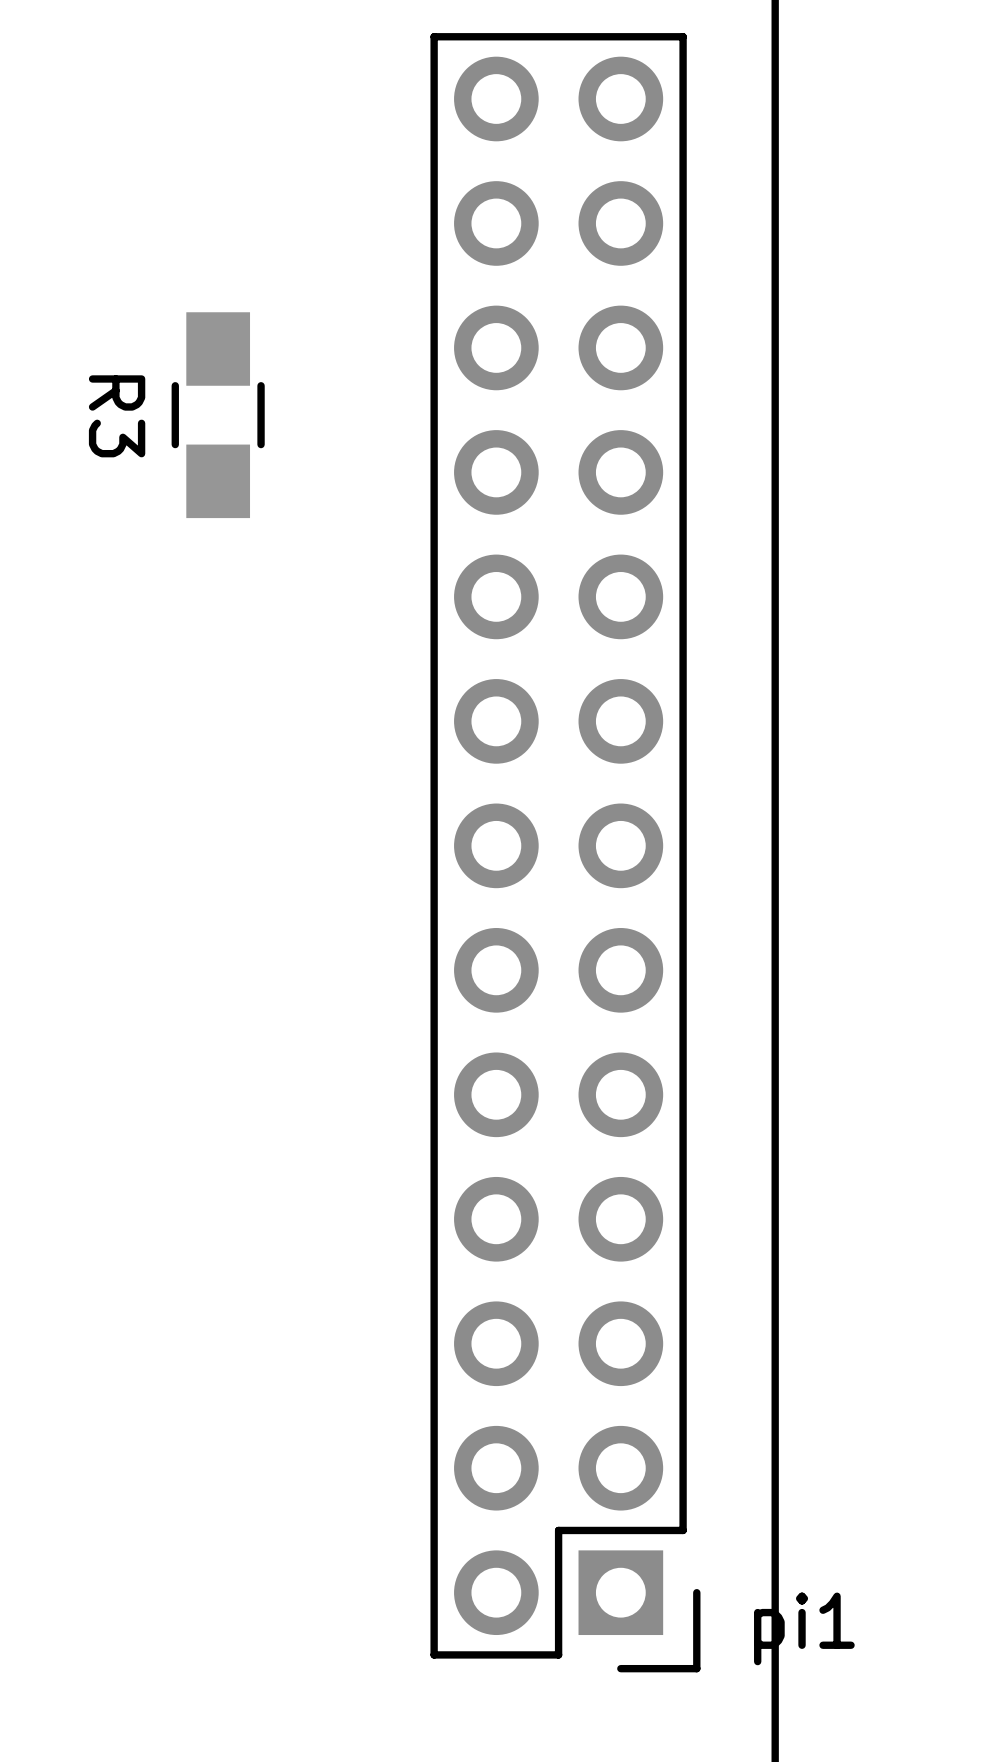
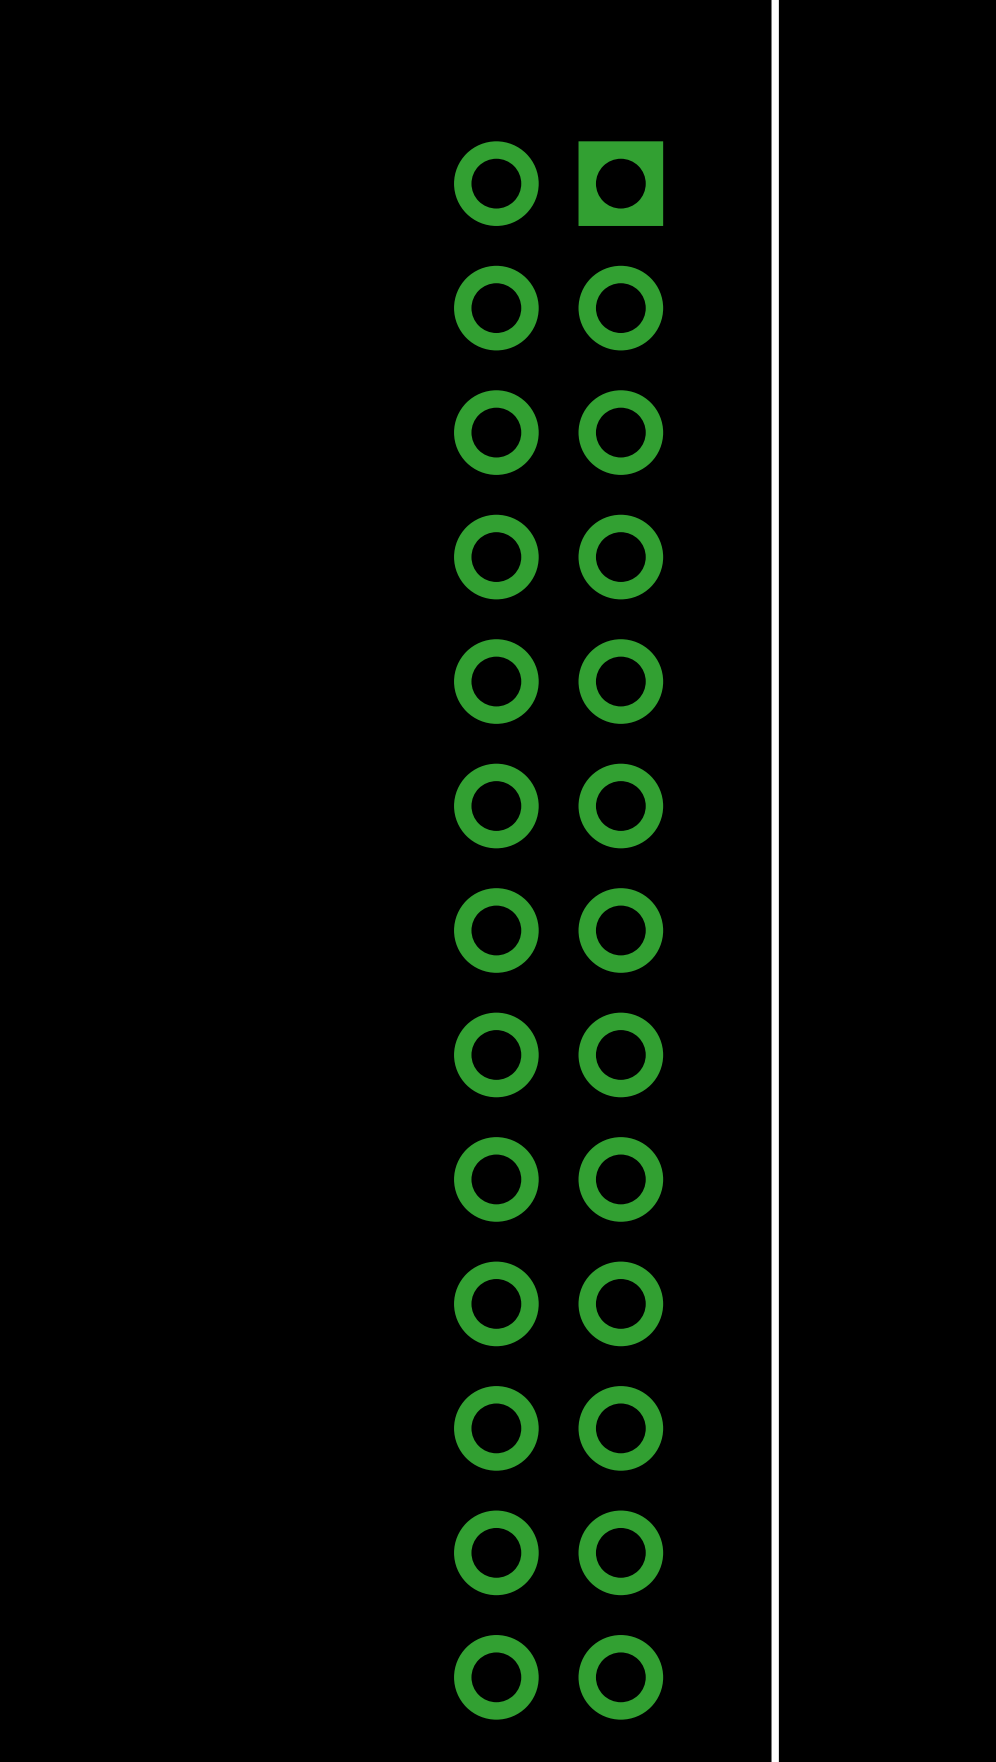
R3: (218, 415) -> none
pi1 side: bottom (565, 852) -> top (558, 930)

